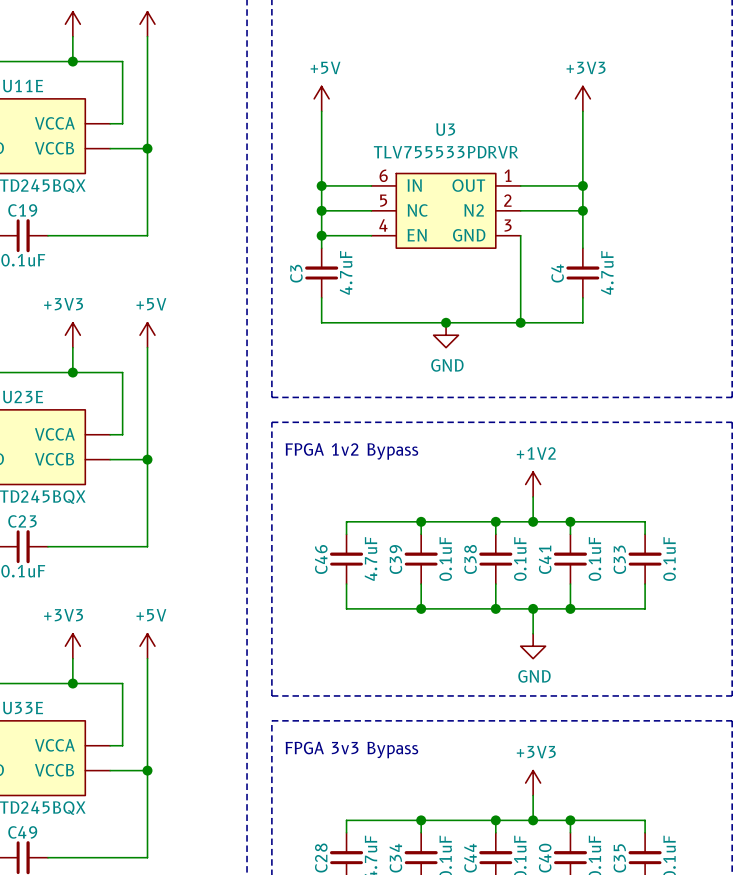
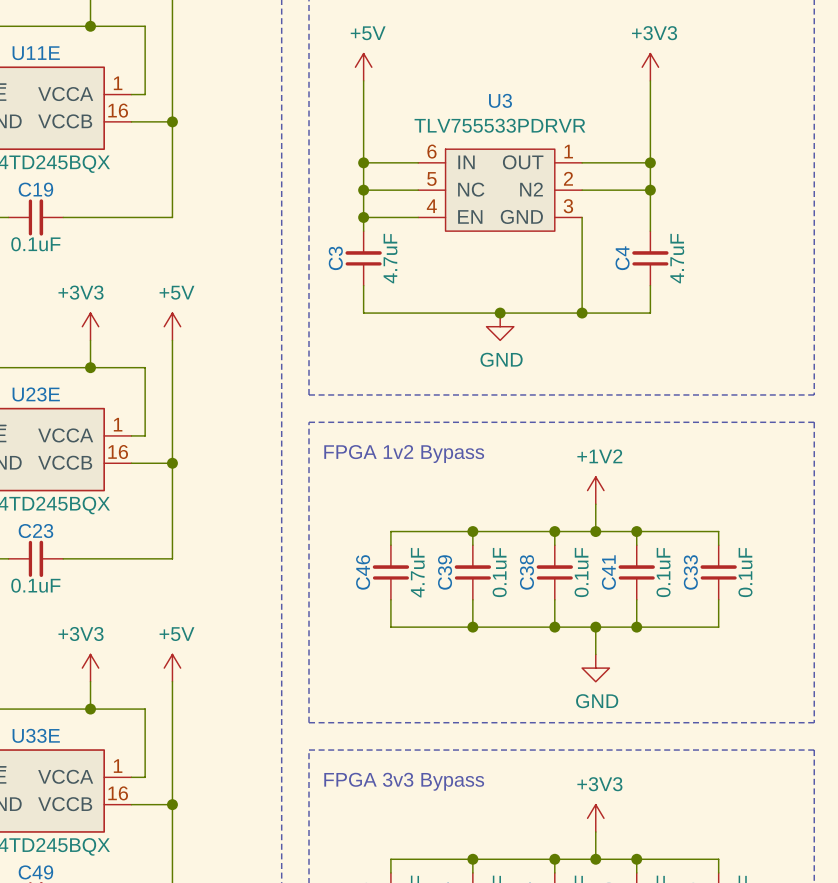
U11E pin number: none -> 1 (118, 83)
U11E pin number: none -> 16 (118, 110)
U23E pin number: none -> 1 (118, 424)
U23E pin number: none -> 16 (118, 451)
U33E pin number: none -> 1 (118, 766)
U33E pin number: none -> 16 (118, 793)

